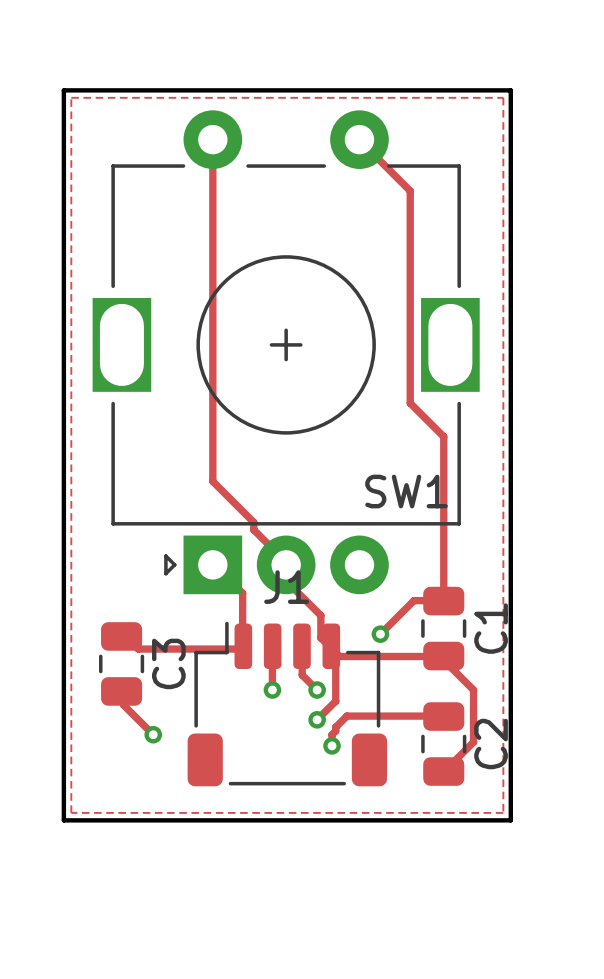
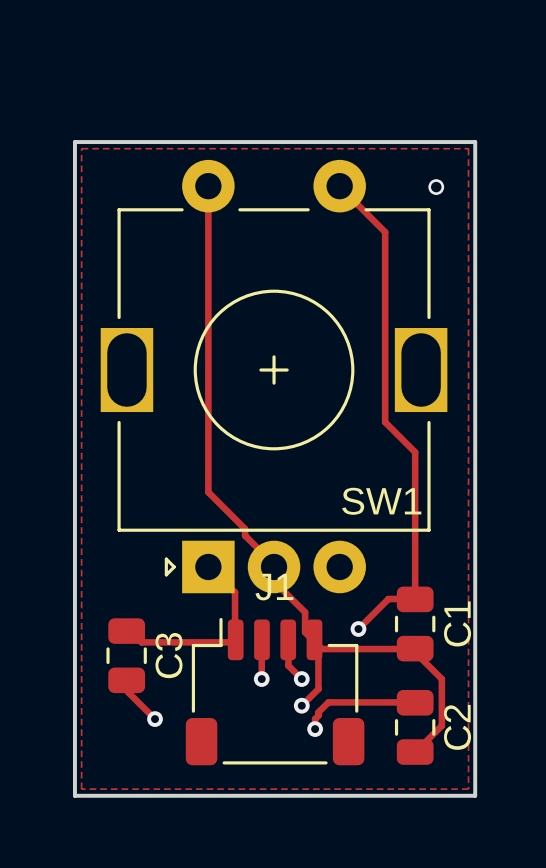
via: none -> (436, 187)

